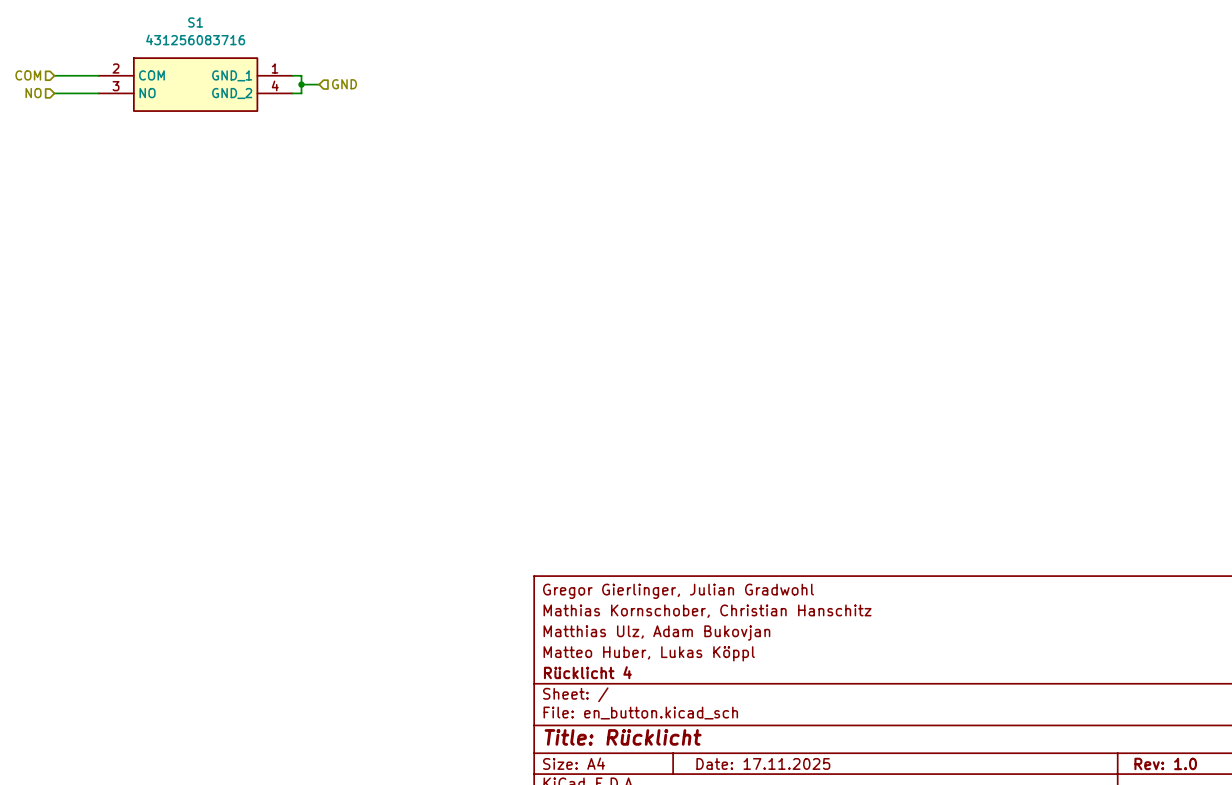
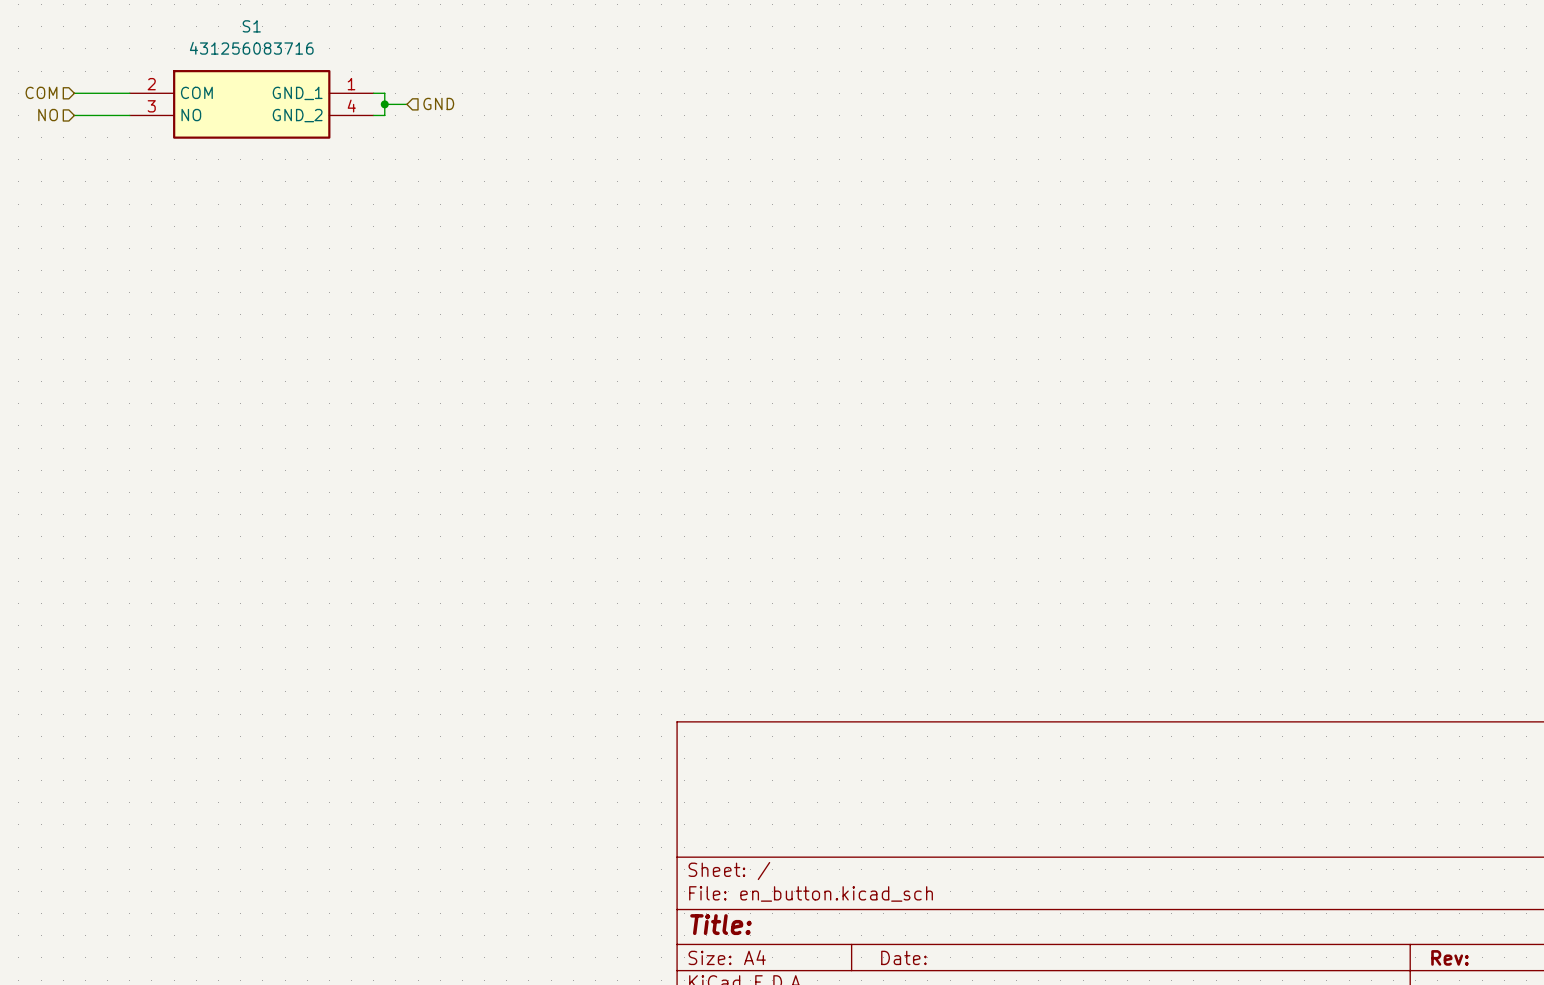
title block: Gregor Gierlinger, Julian Gradwohl (678, 591) -> none
title block: Mathias Kornschober, Christian Hanschitz (707, 611) -> none
title block: Matthias Ulz, Adam Bukovjan (656, 633) -> none
title block: Matteo Huber, Lukas Köppl (649, 653) -> none
title block: Rücklicht 4 (587, 672) -> none
title block: Title: Rücklicht (623, 737) -> Title: (720, 924)
title block: Date: 17.11.2025 (763, 763) -> Date: (903, 957)
title block: Rev: 1.0 (1165, 763) -> Rev: (1449, 957)

